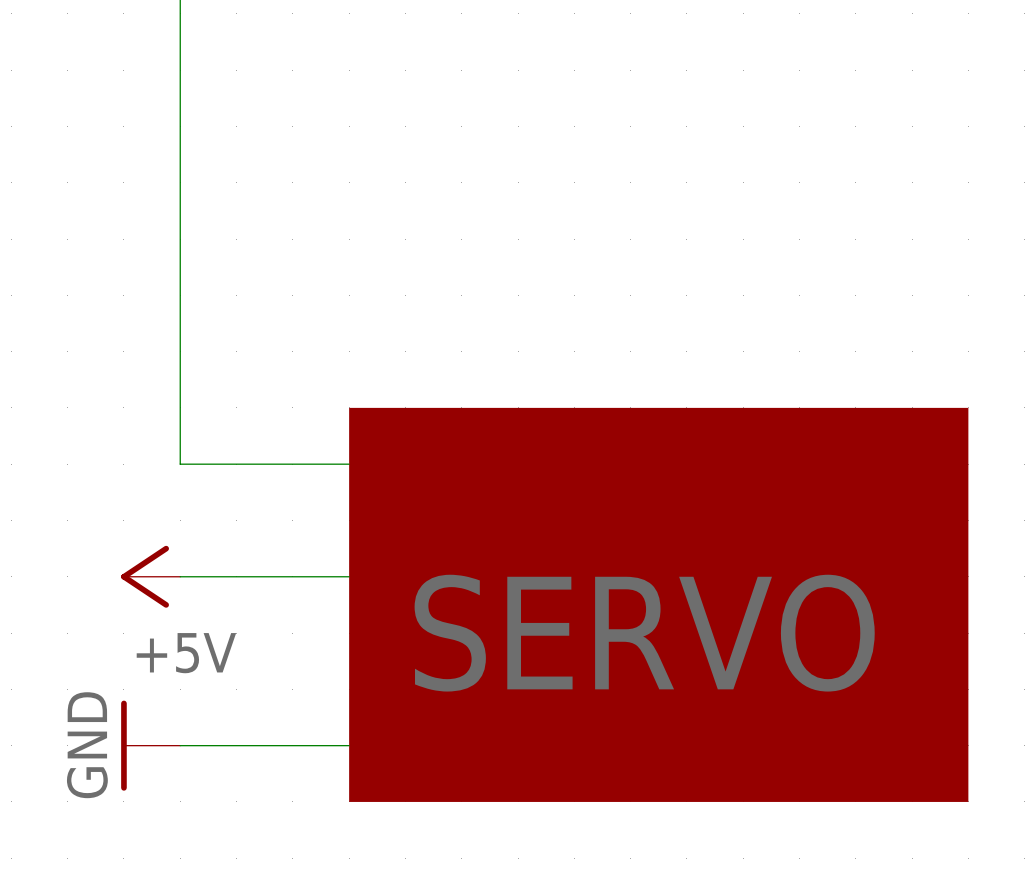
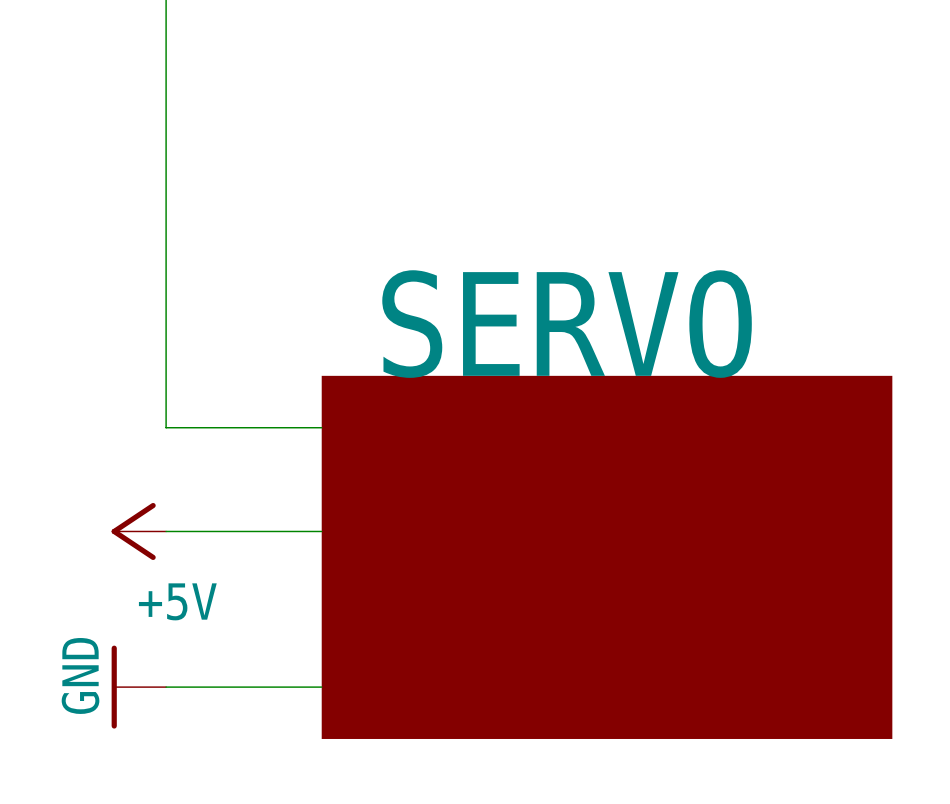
text position: SERVO (644, 633) -> SERVO (567, 324)

